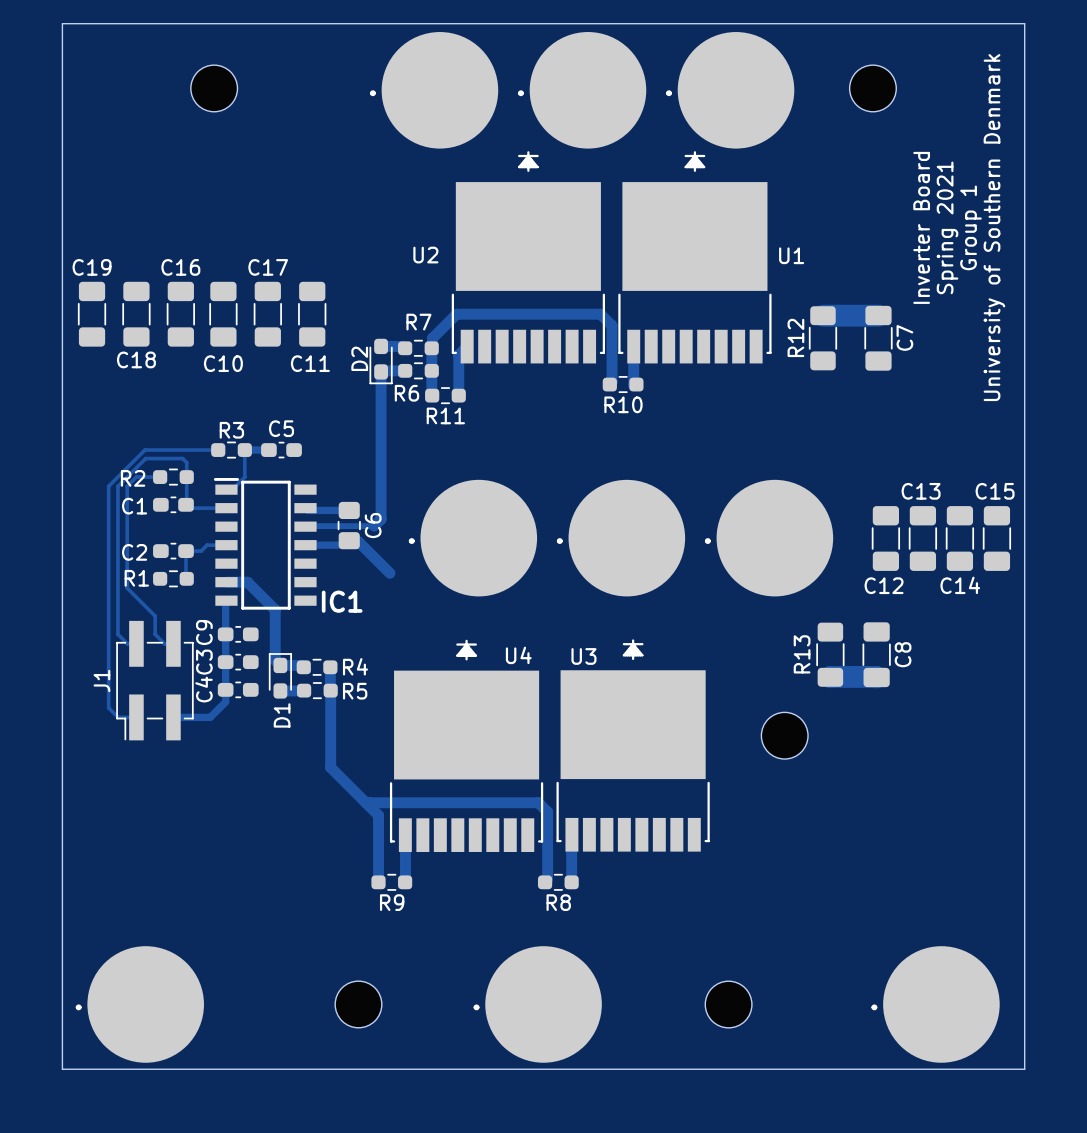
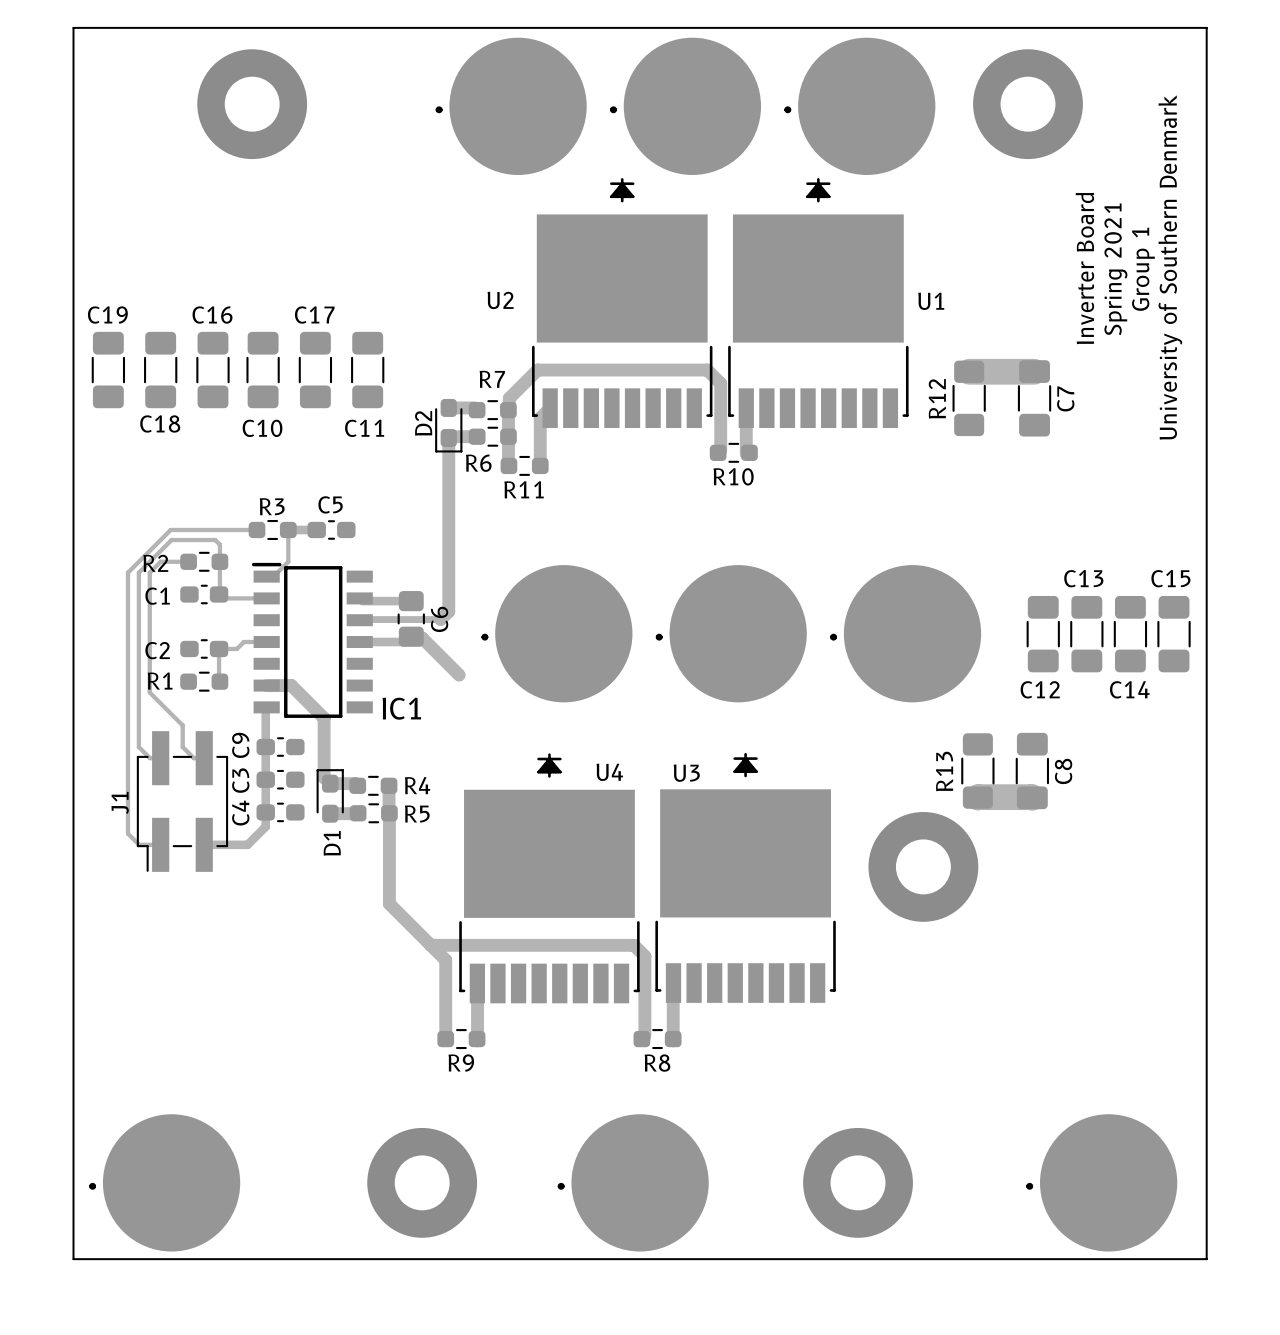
part footprint: [190, 65, 238, 112] -> [197, 49, 308, 160]
part footprint: [849, 65, 897, 112] -> [973, 49, 1083, 160]
part footprint: [761, 712, 809, 760] -> [868, 811, 979, 922]
part footprint: [335, 981, 382, 1028] -> [367, 1127, 478, 1238]
part footprint: [705, 981, 752, 1028] -> [803, 1127, 913, 1238]

